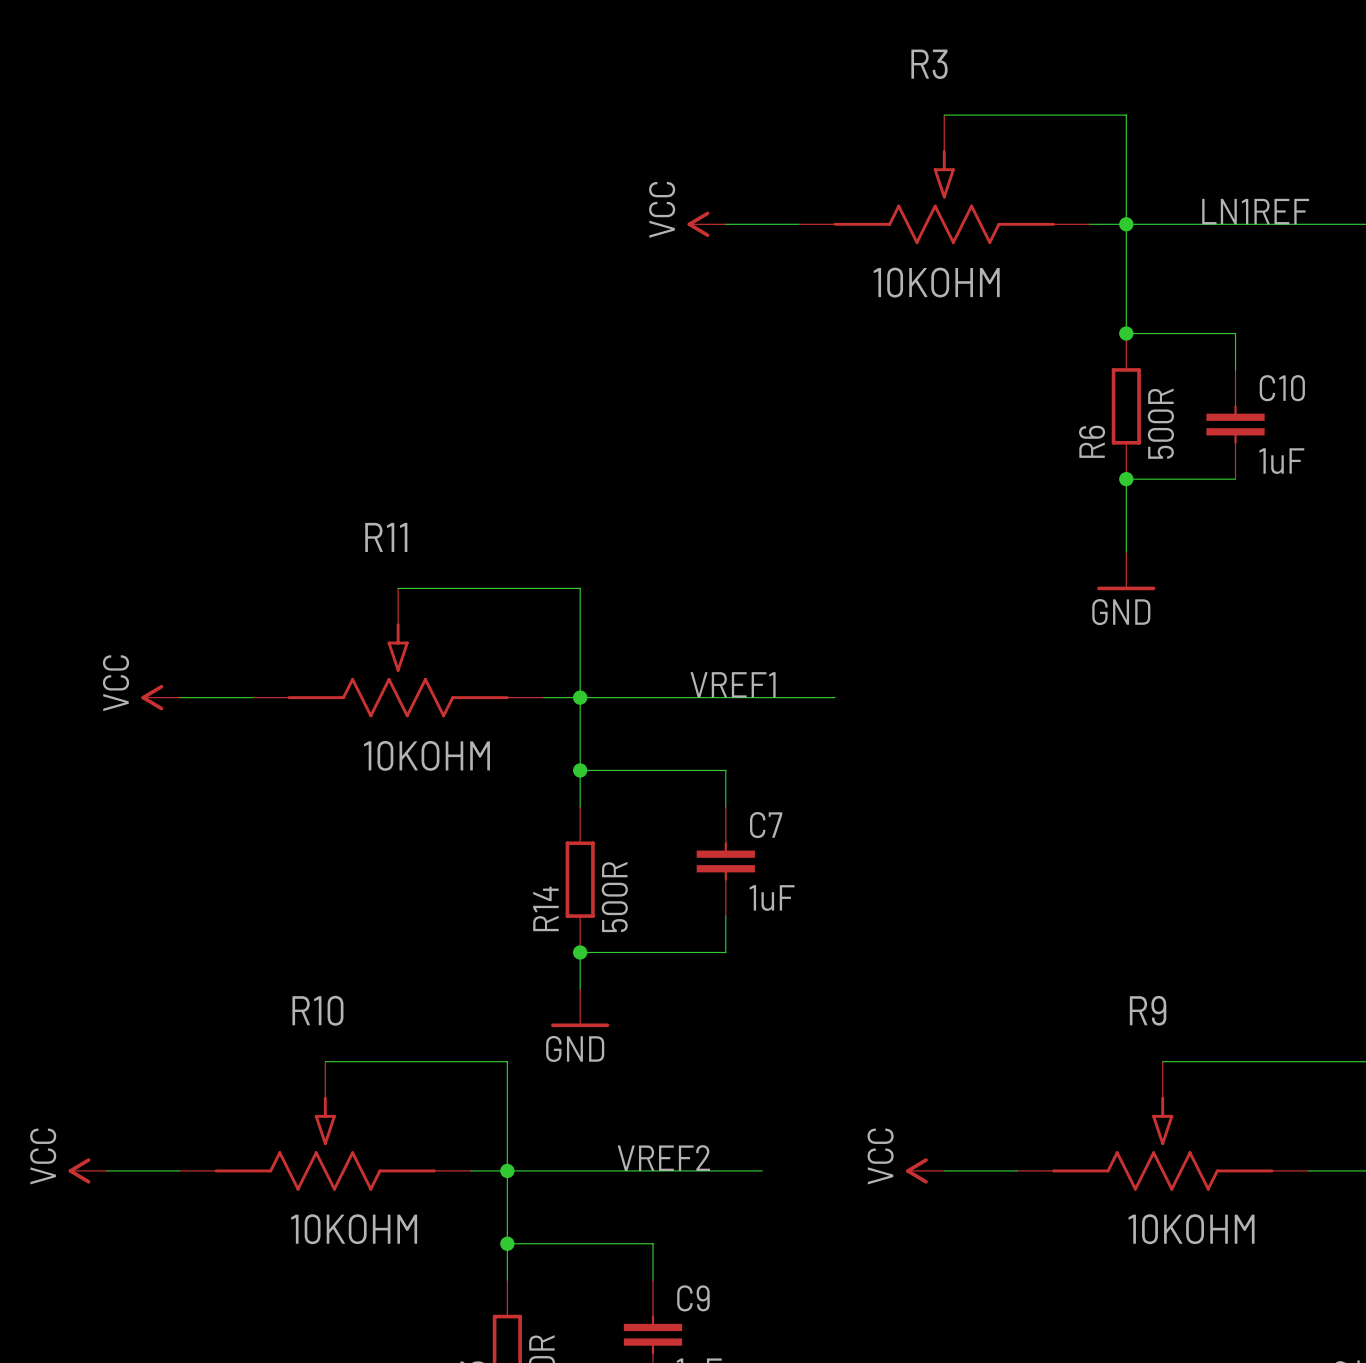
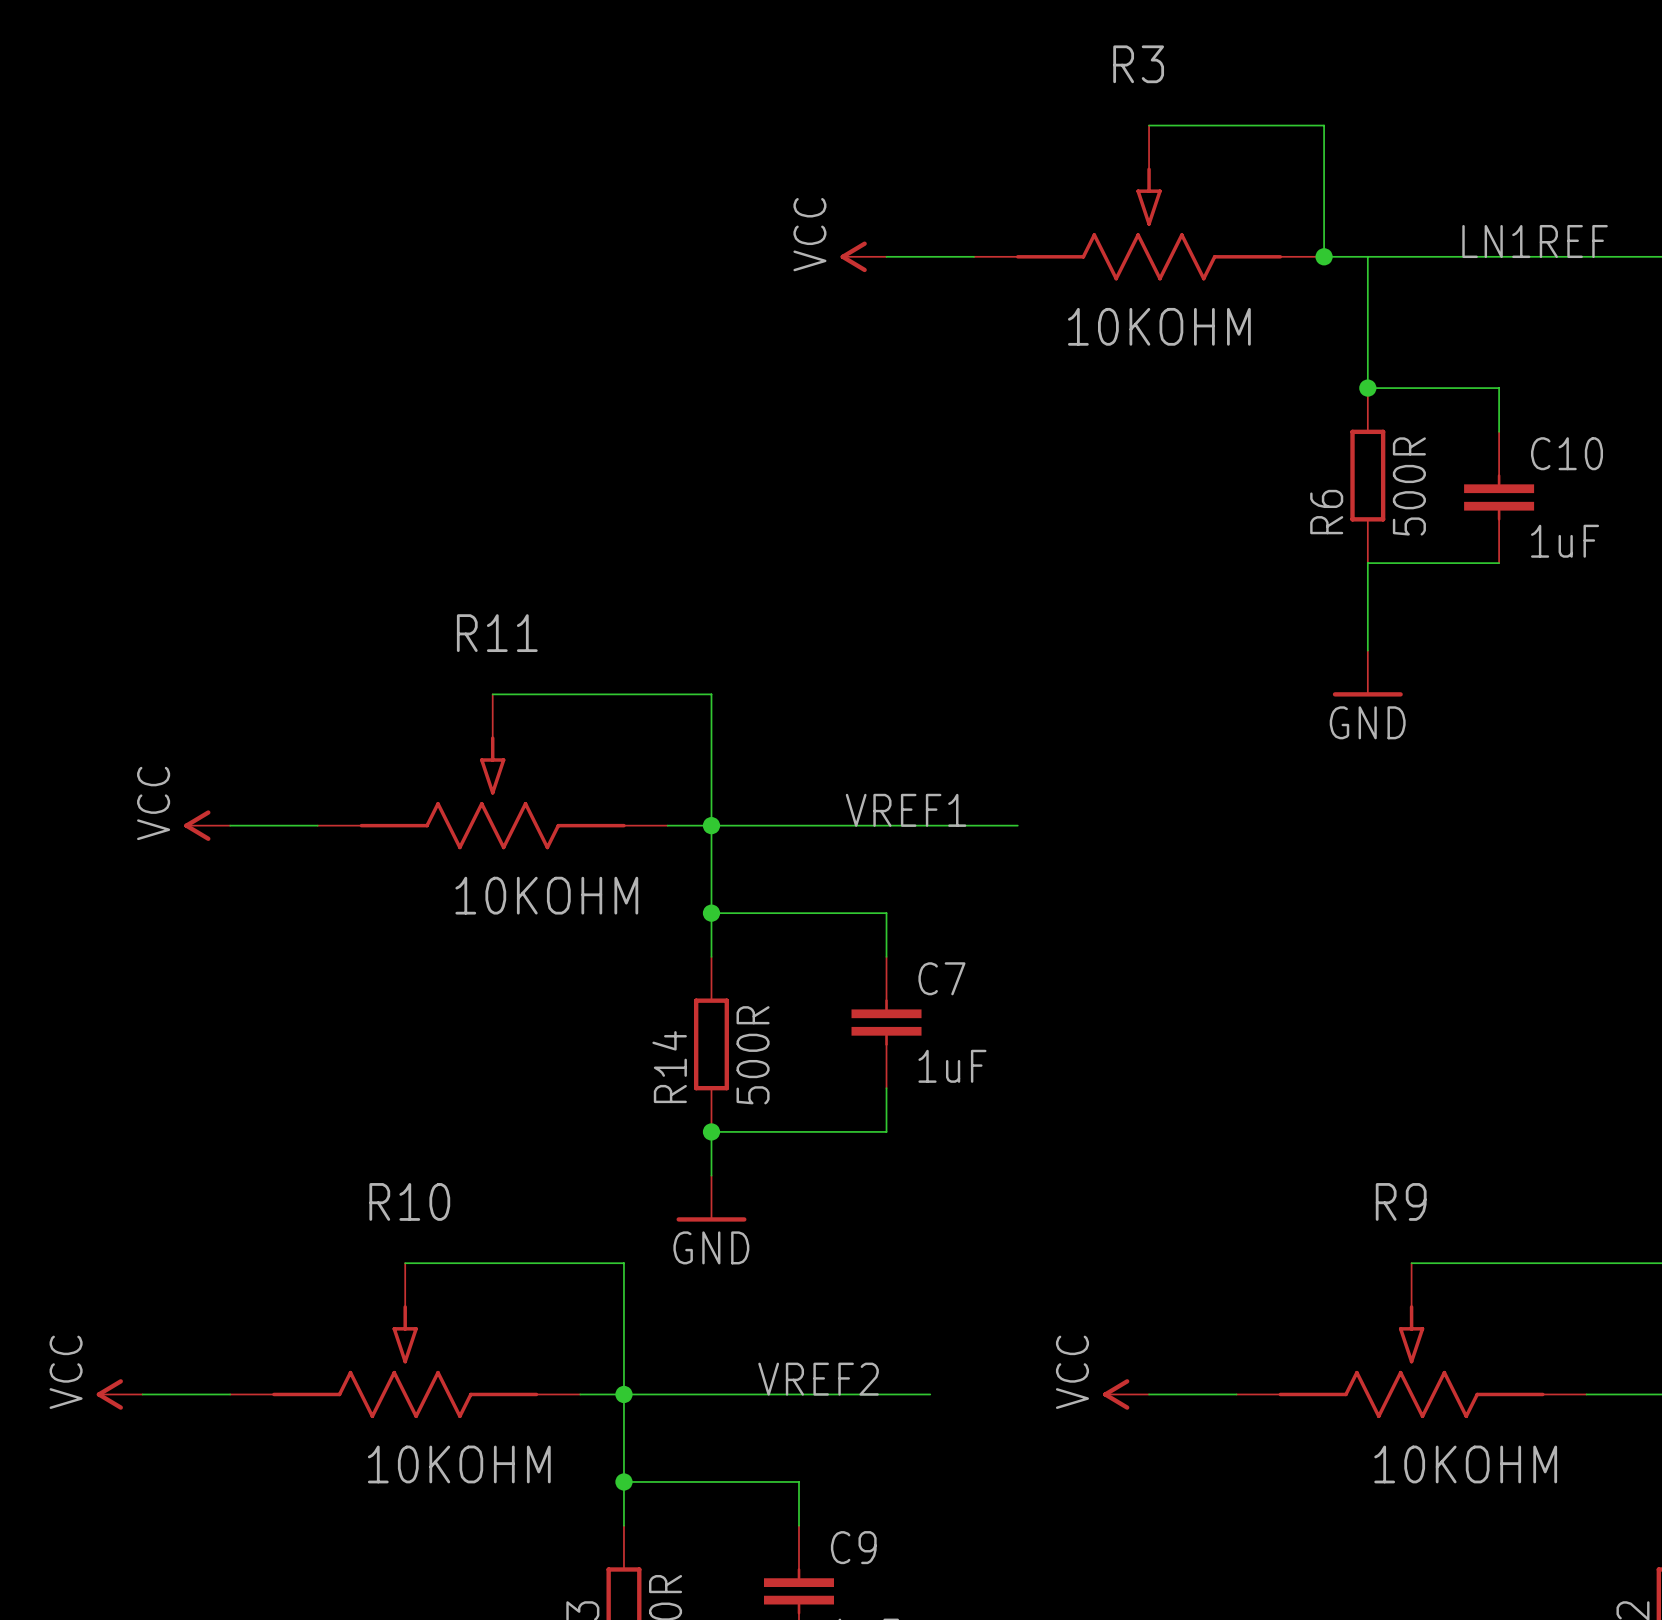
wire: (1089, 115) (1126, 115) (1126, 224) -> (1324, 125) (1324, 256)
junction position: (1126, 224) -> (1324, 256)
junction: (1126, 479) -> none

